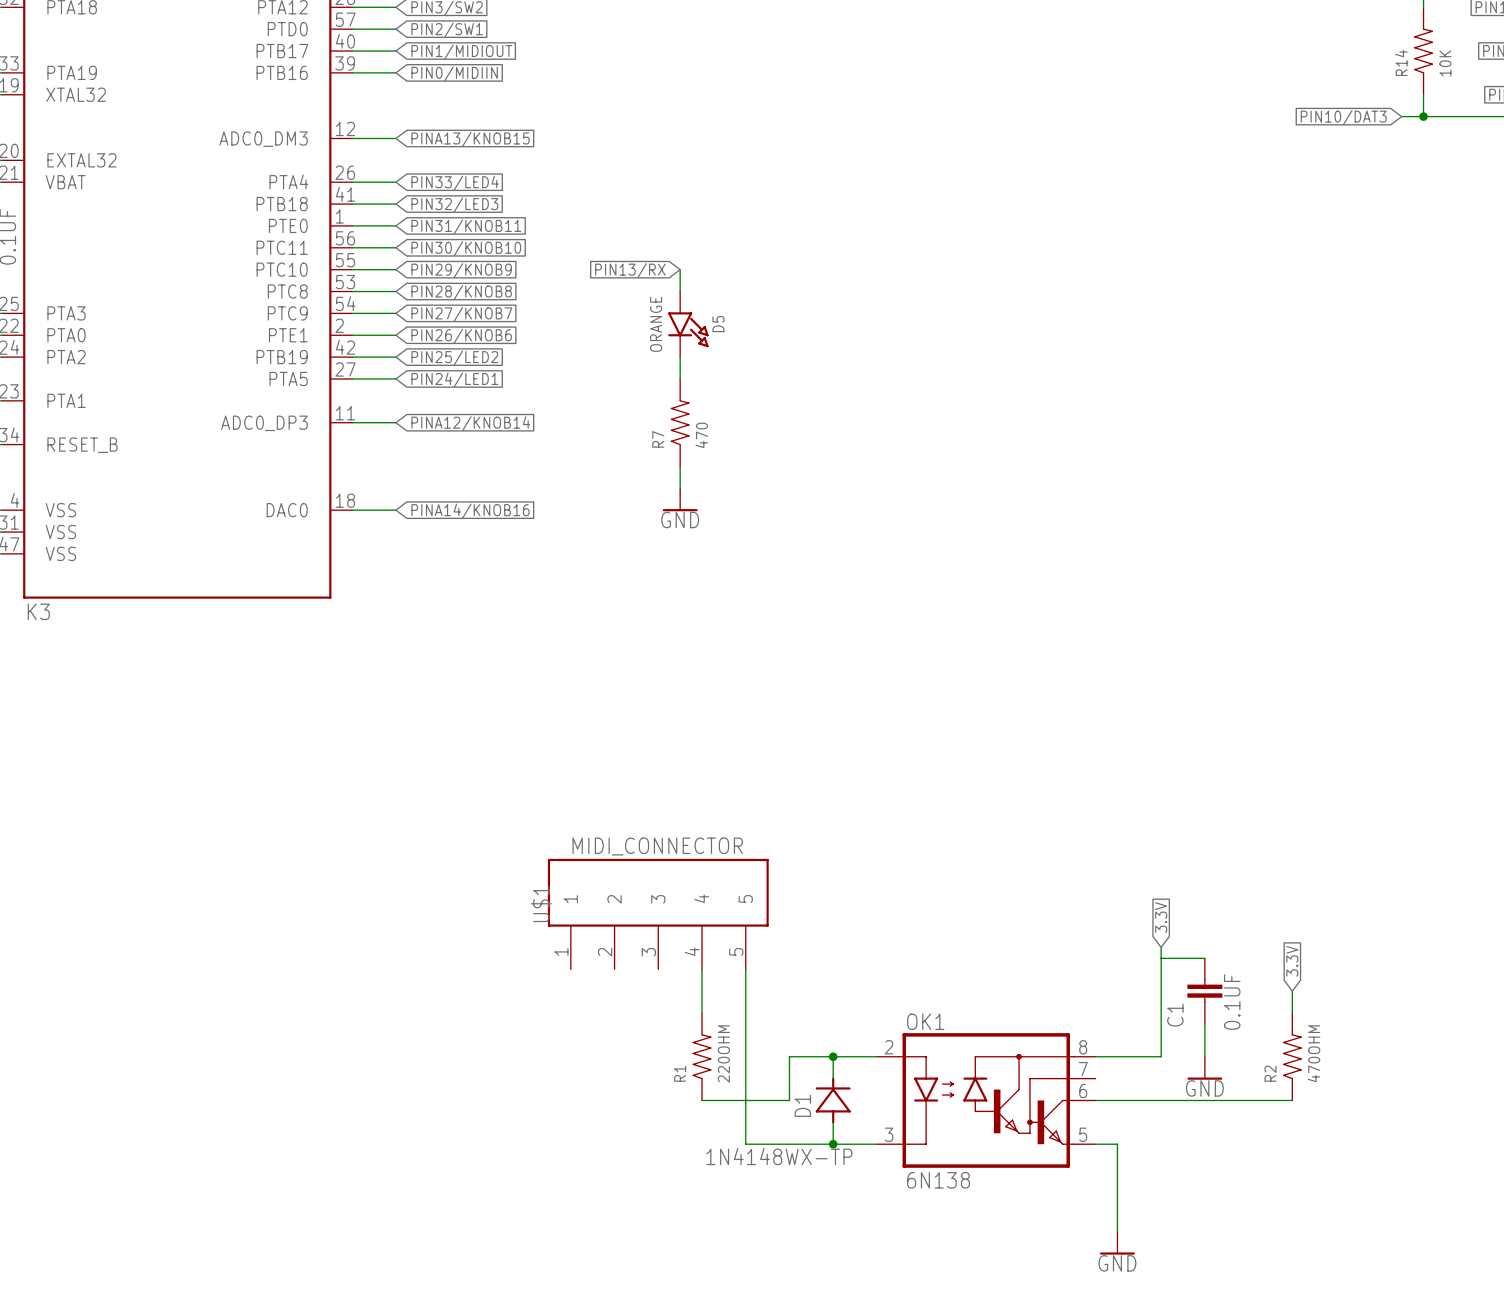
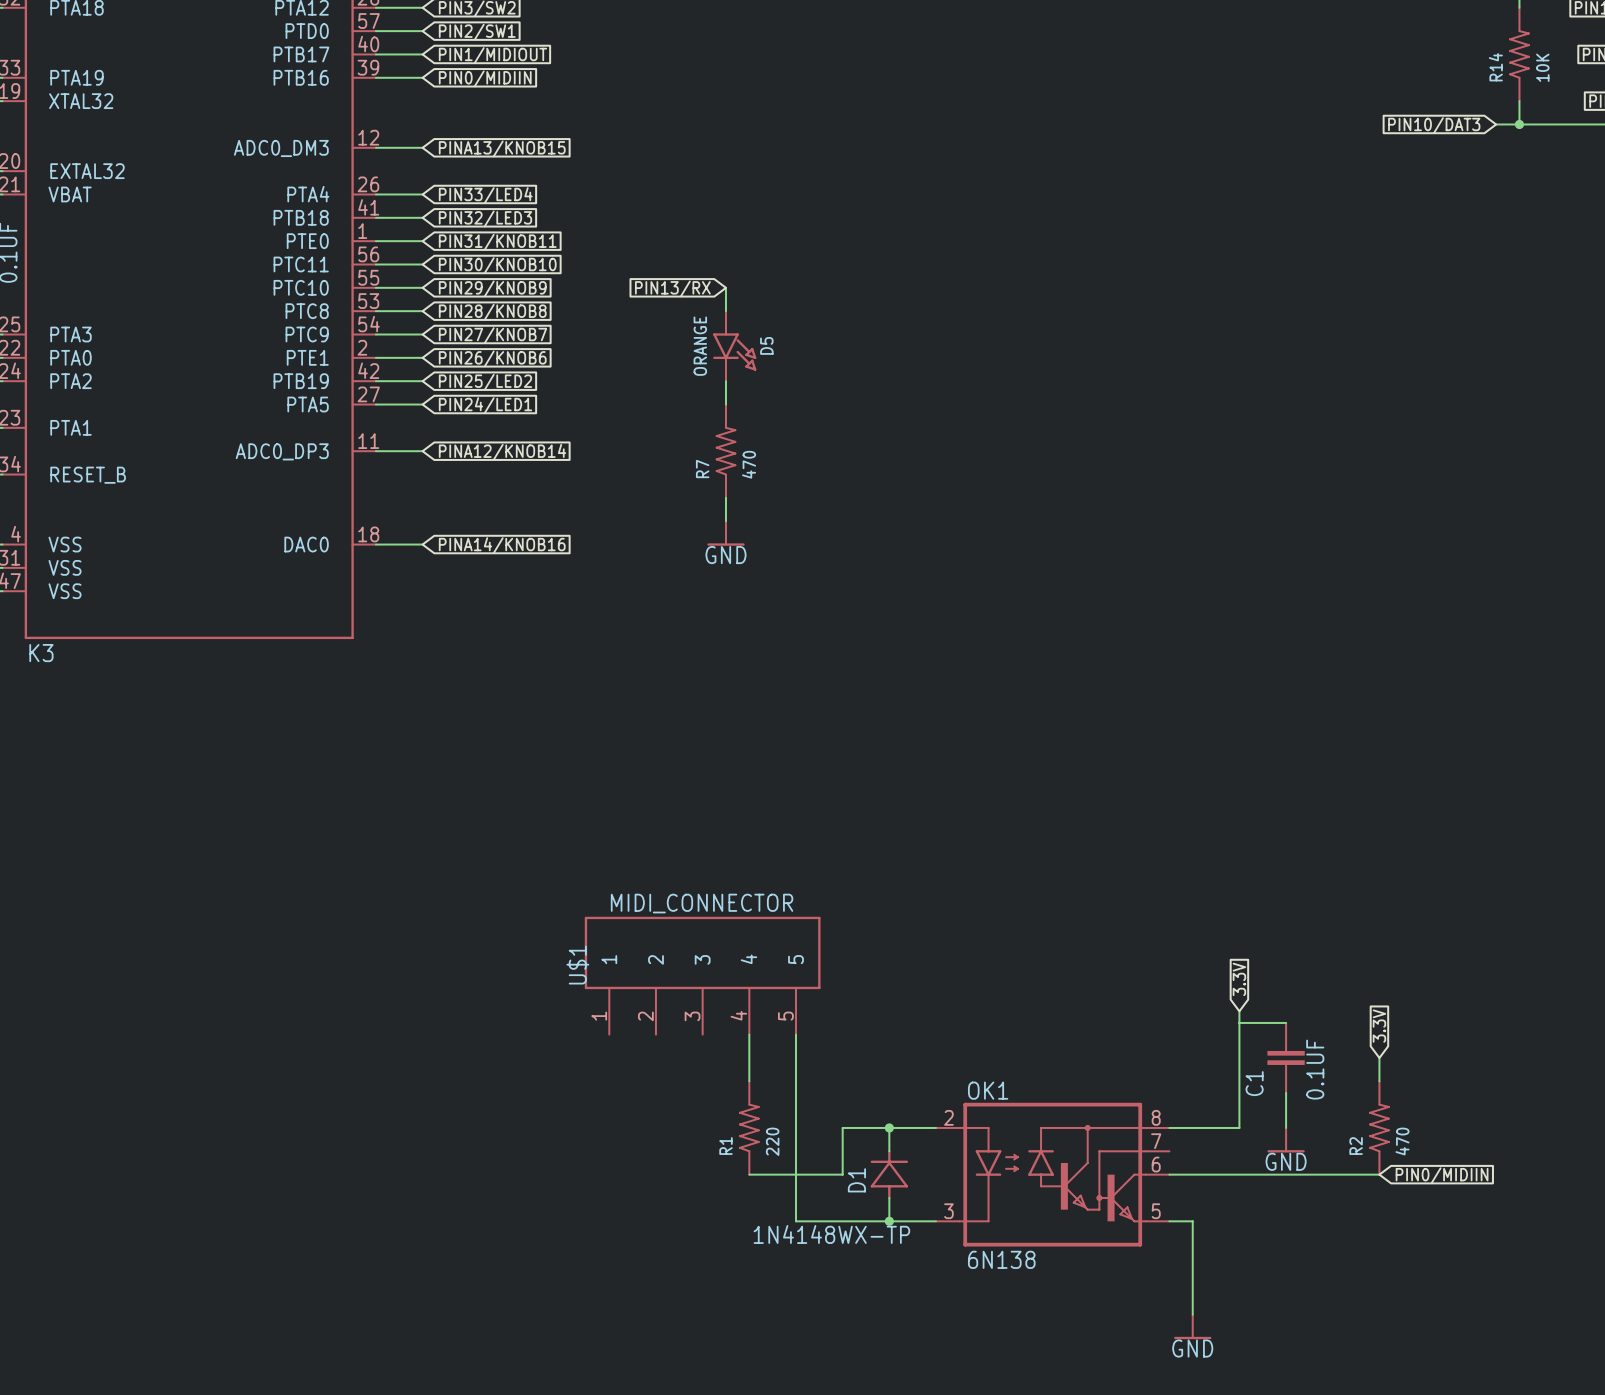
R1 value: 220OHM (723, 1053) -> 220 (772, 1141)
R2 value: 470OHM (1313, 1053) -> 470 (1402, 1141)
global label: none -> PIN0/MIDIIN (1442, 1175)

